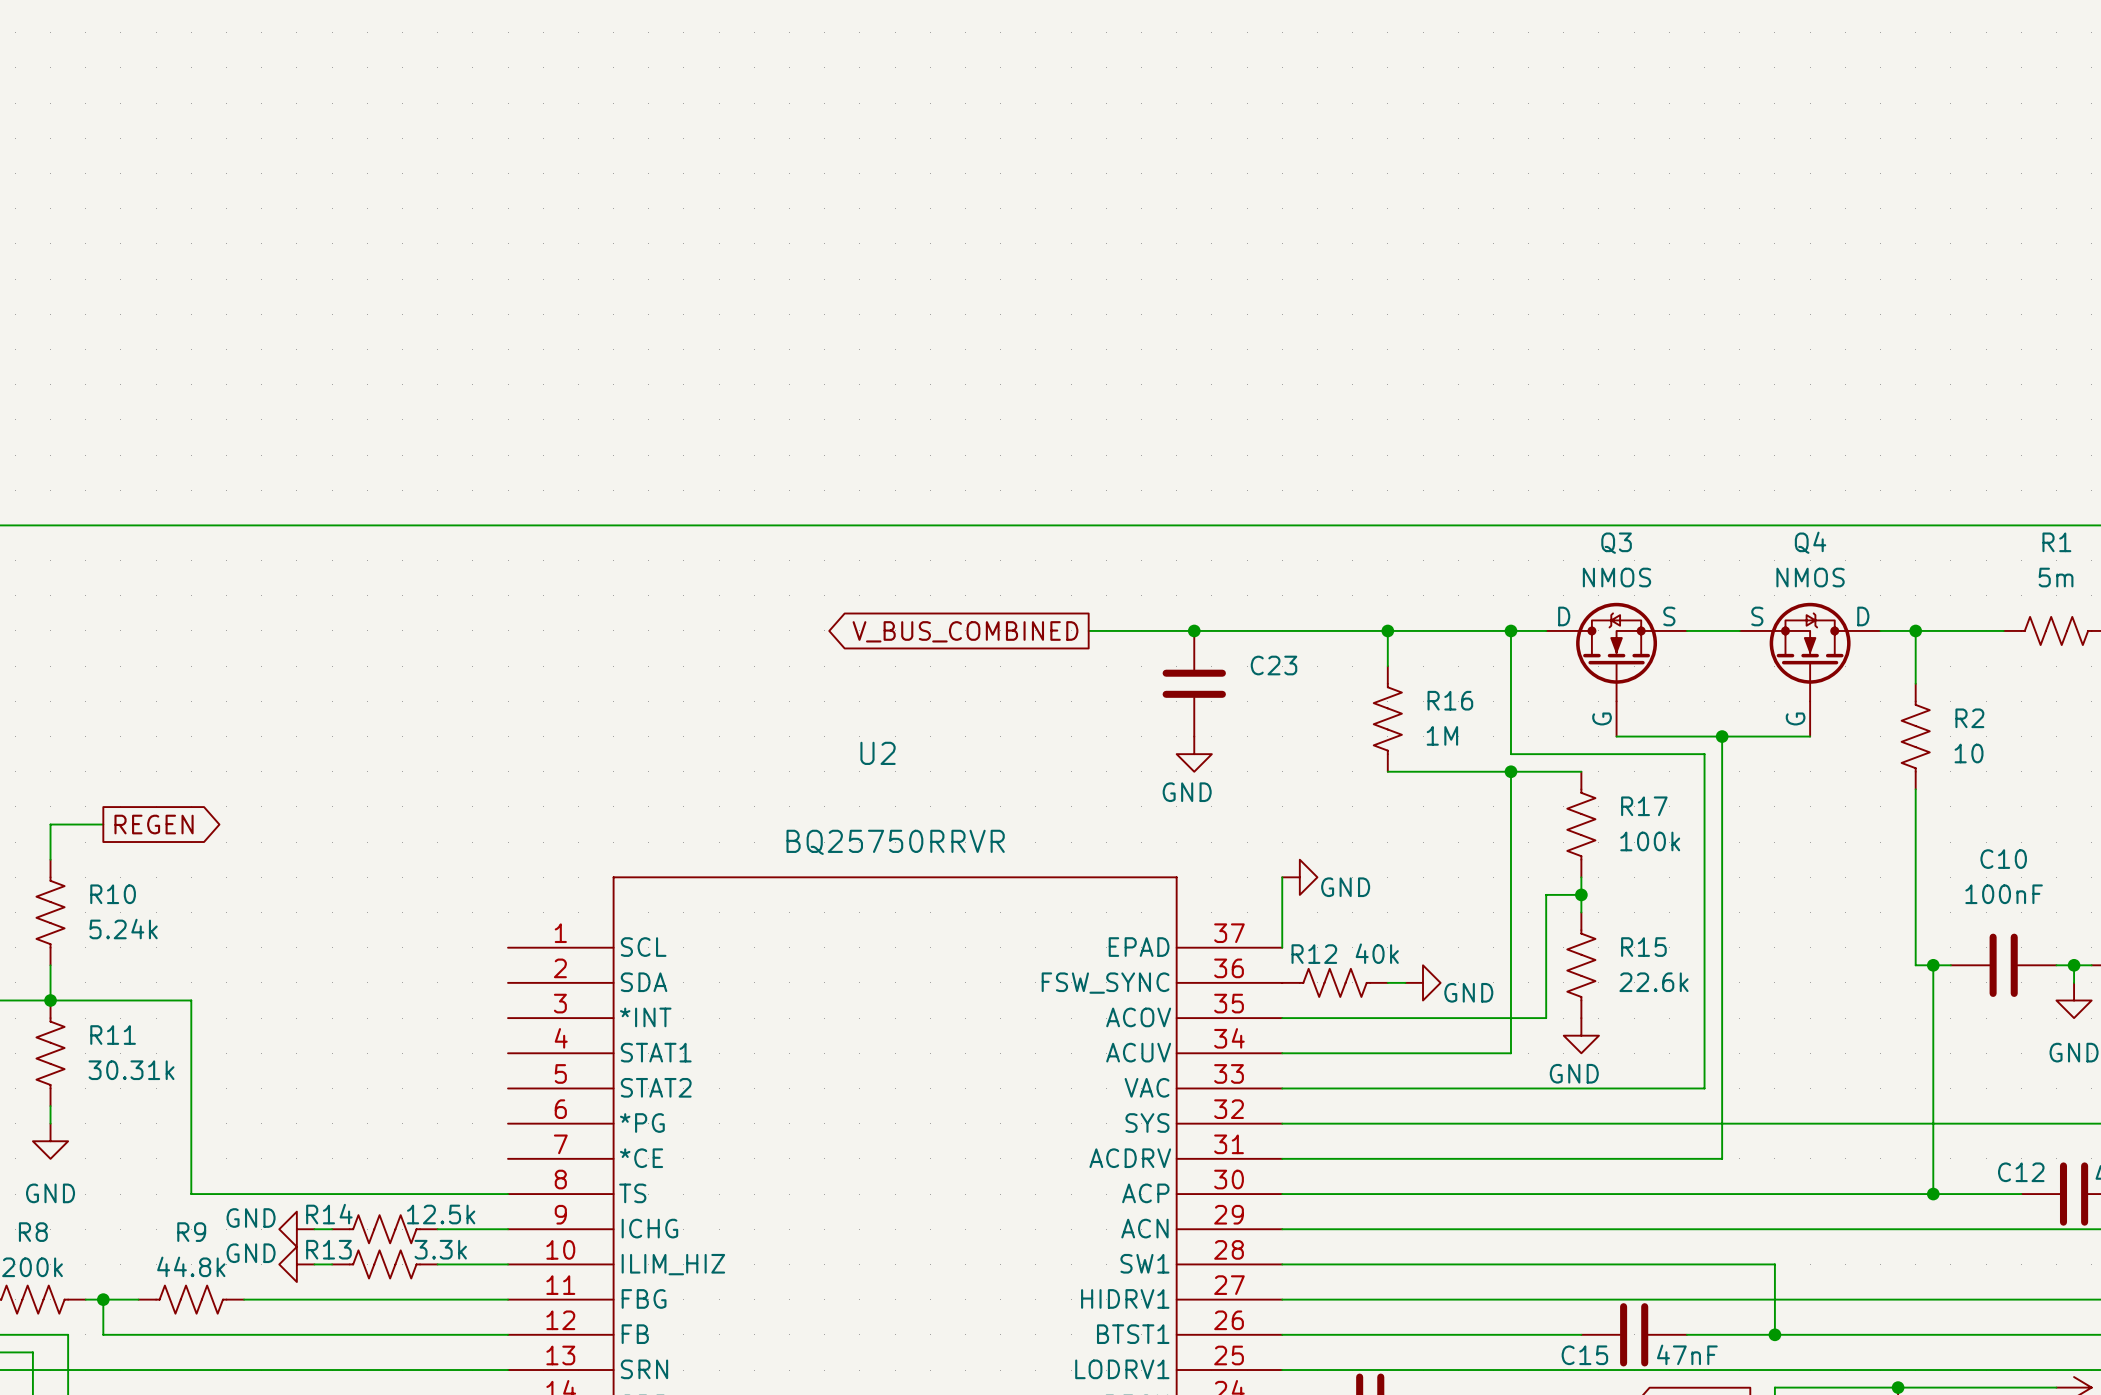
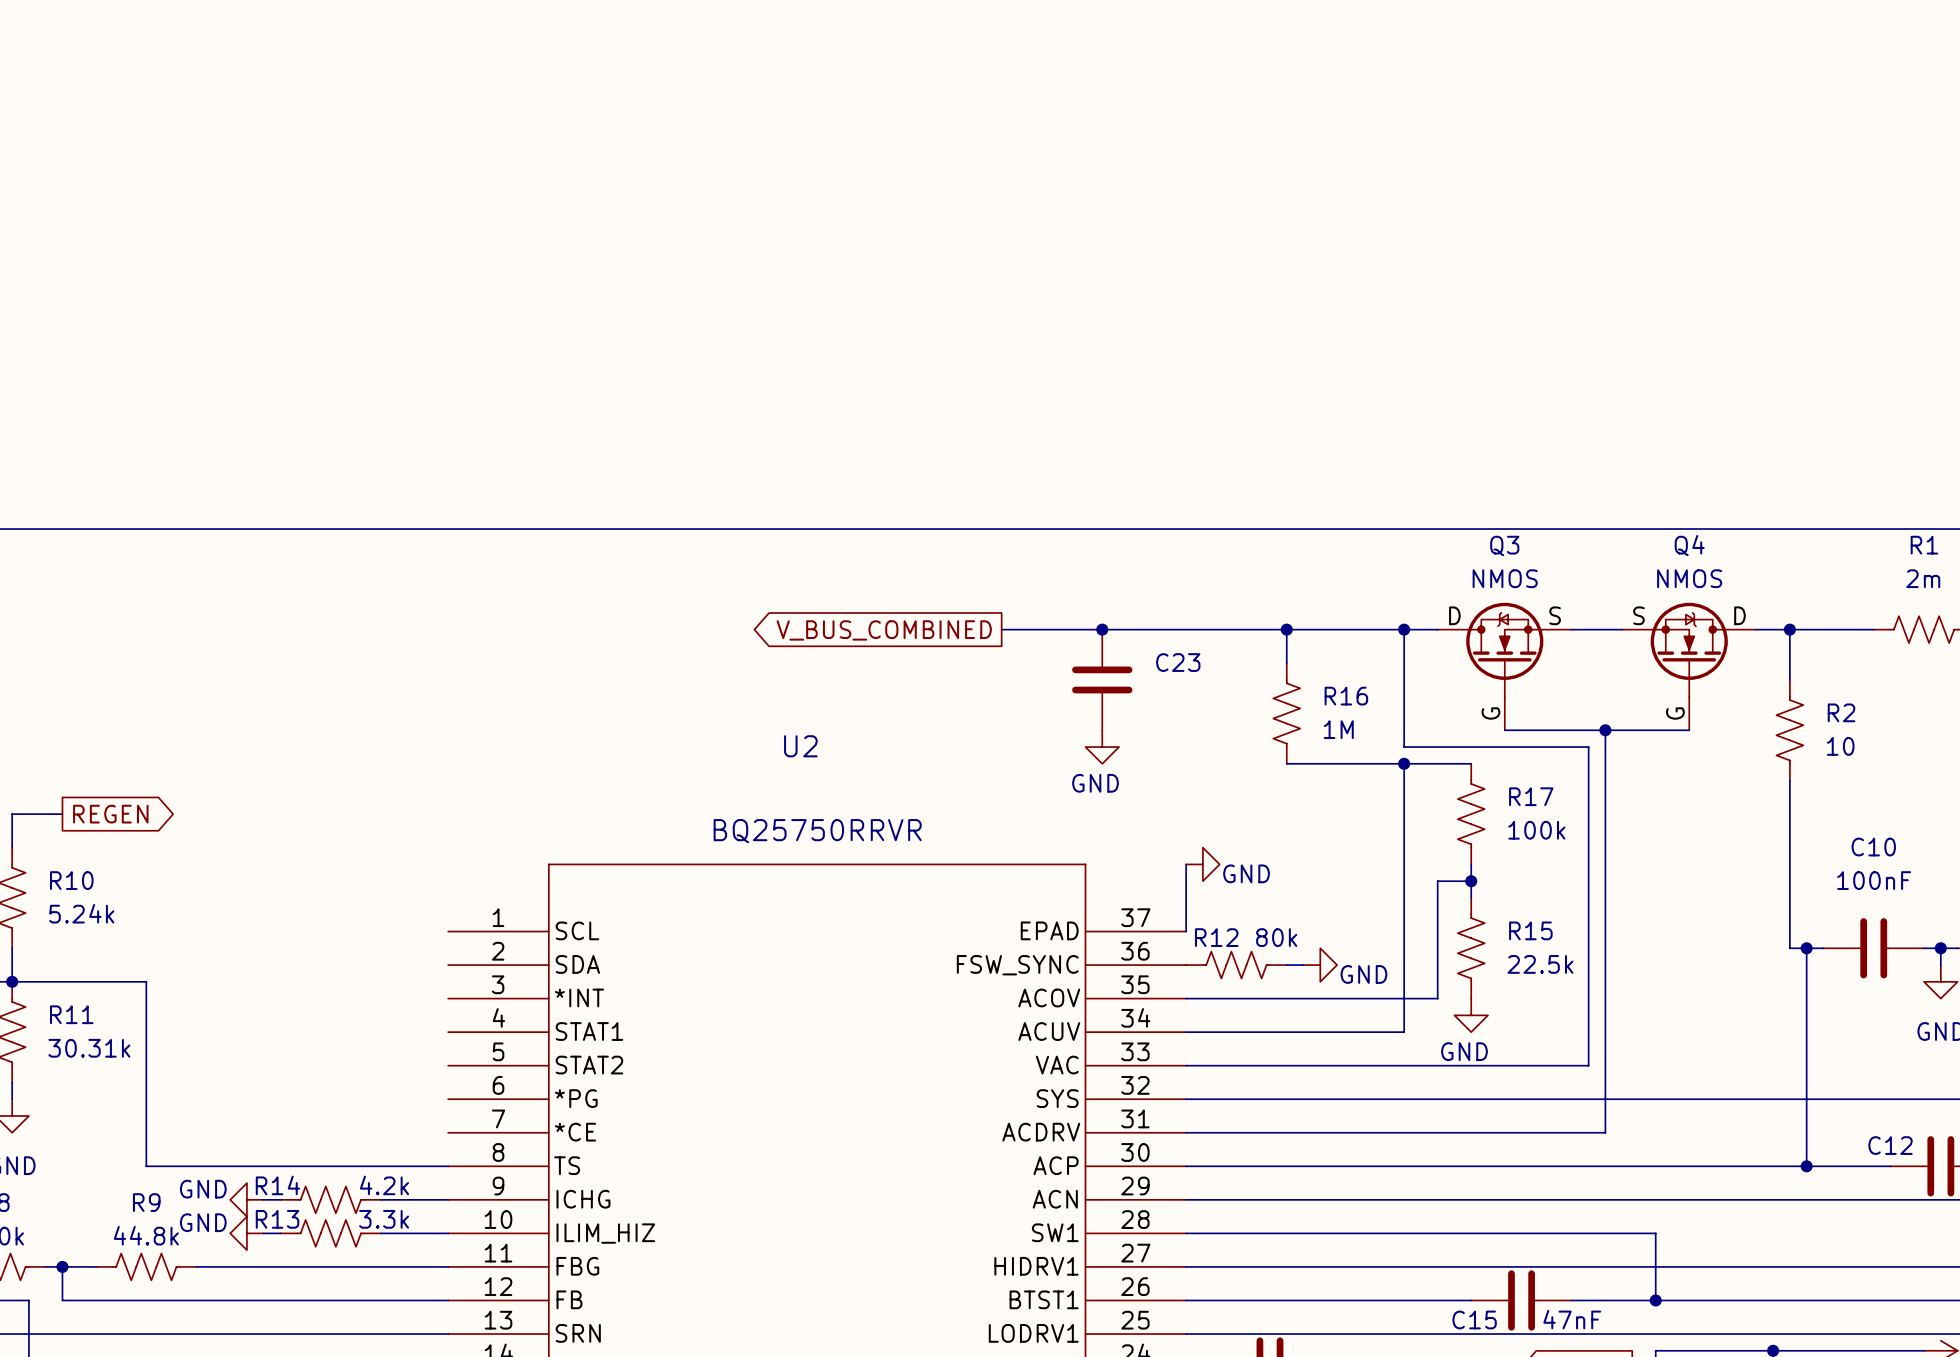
R1 value: 5m (2056, 577) -> 2m (1923, 578)
R12 value: 40k (1377, 953) -> 80k (1276, 937)
R15 value: 22.6k (1653, 982) -> 22.5k (1540, 964)
R14 value: 12.5k (441, 1214) -> 4.2k (384, 1185)

